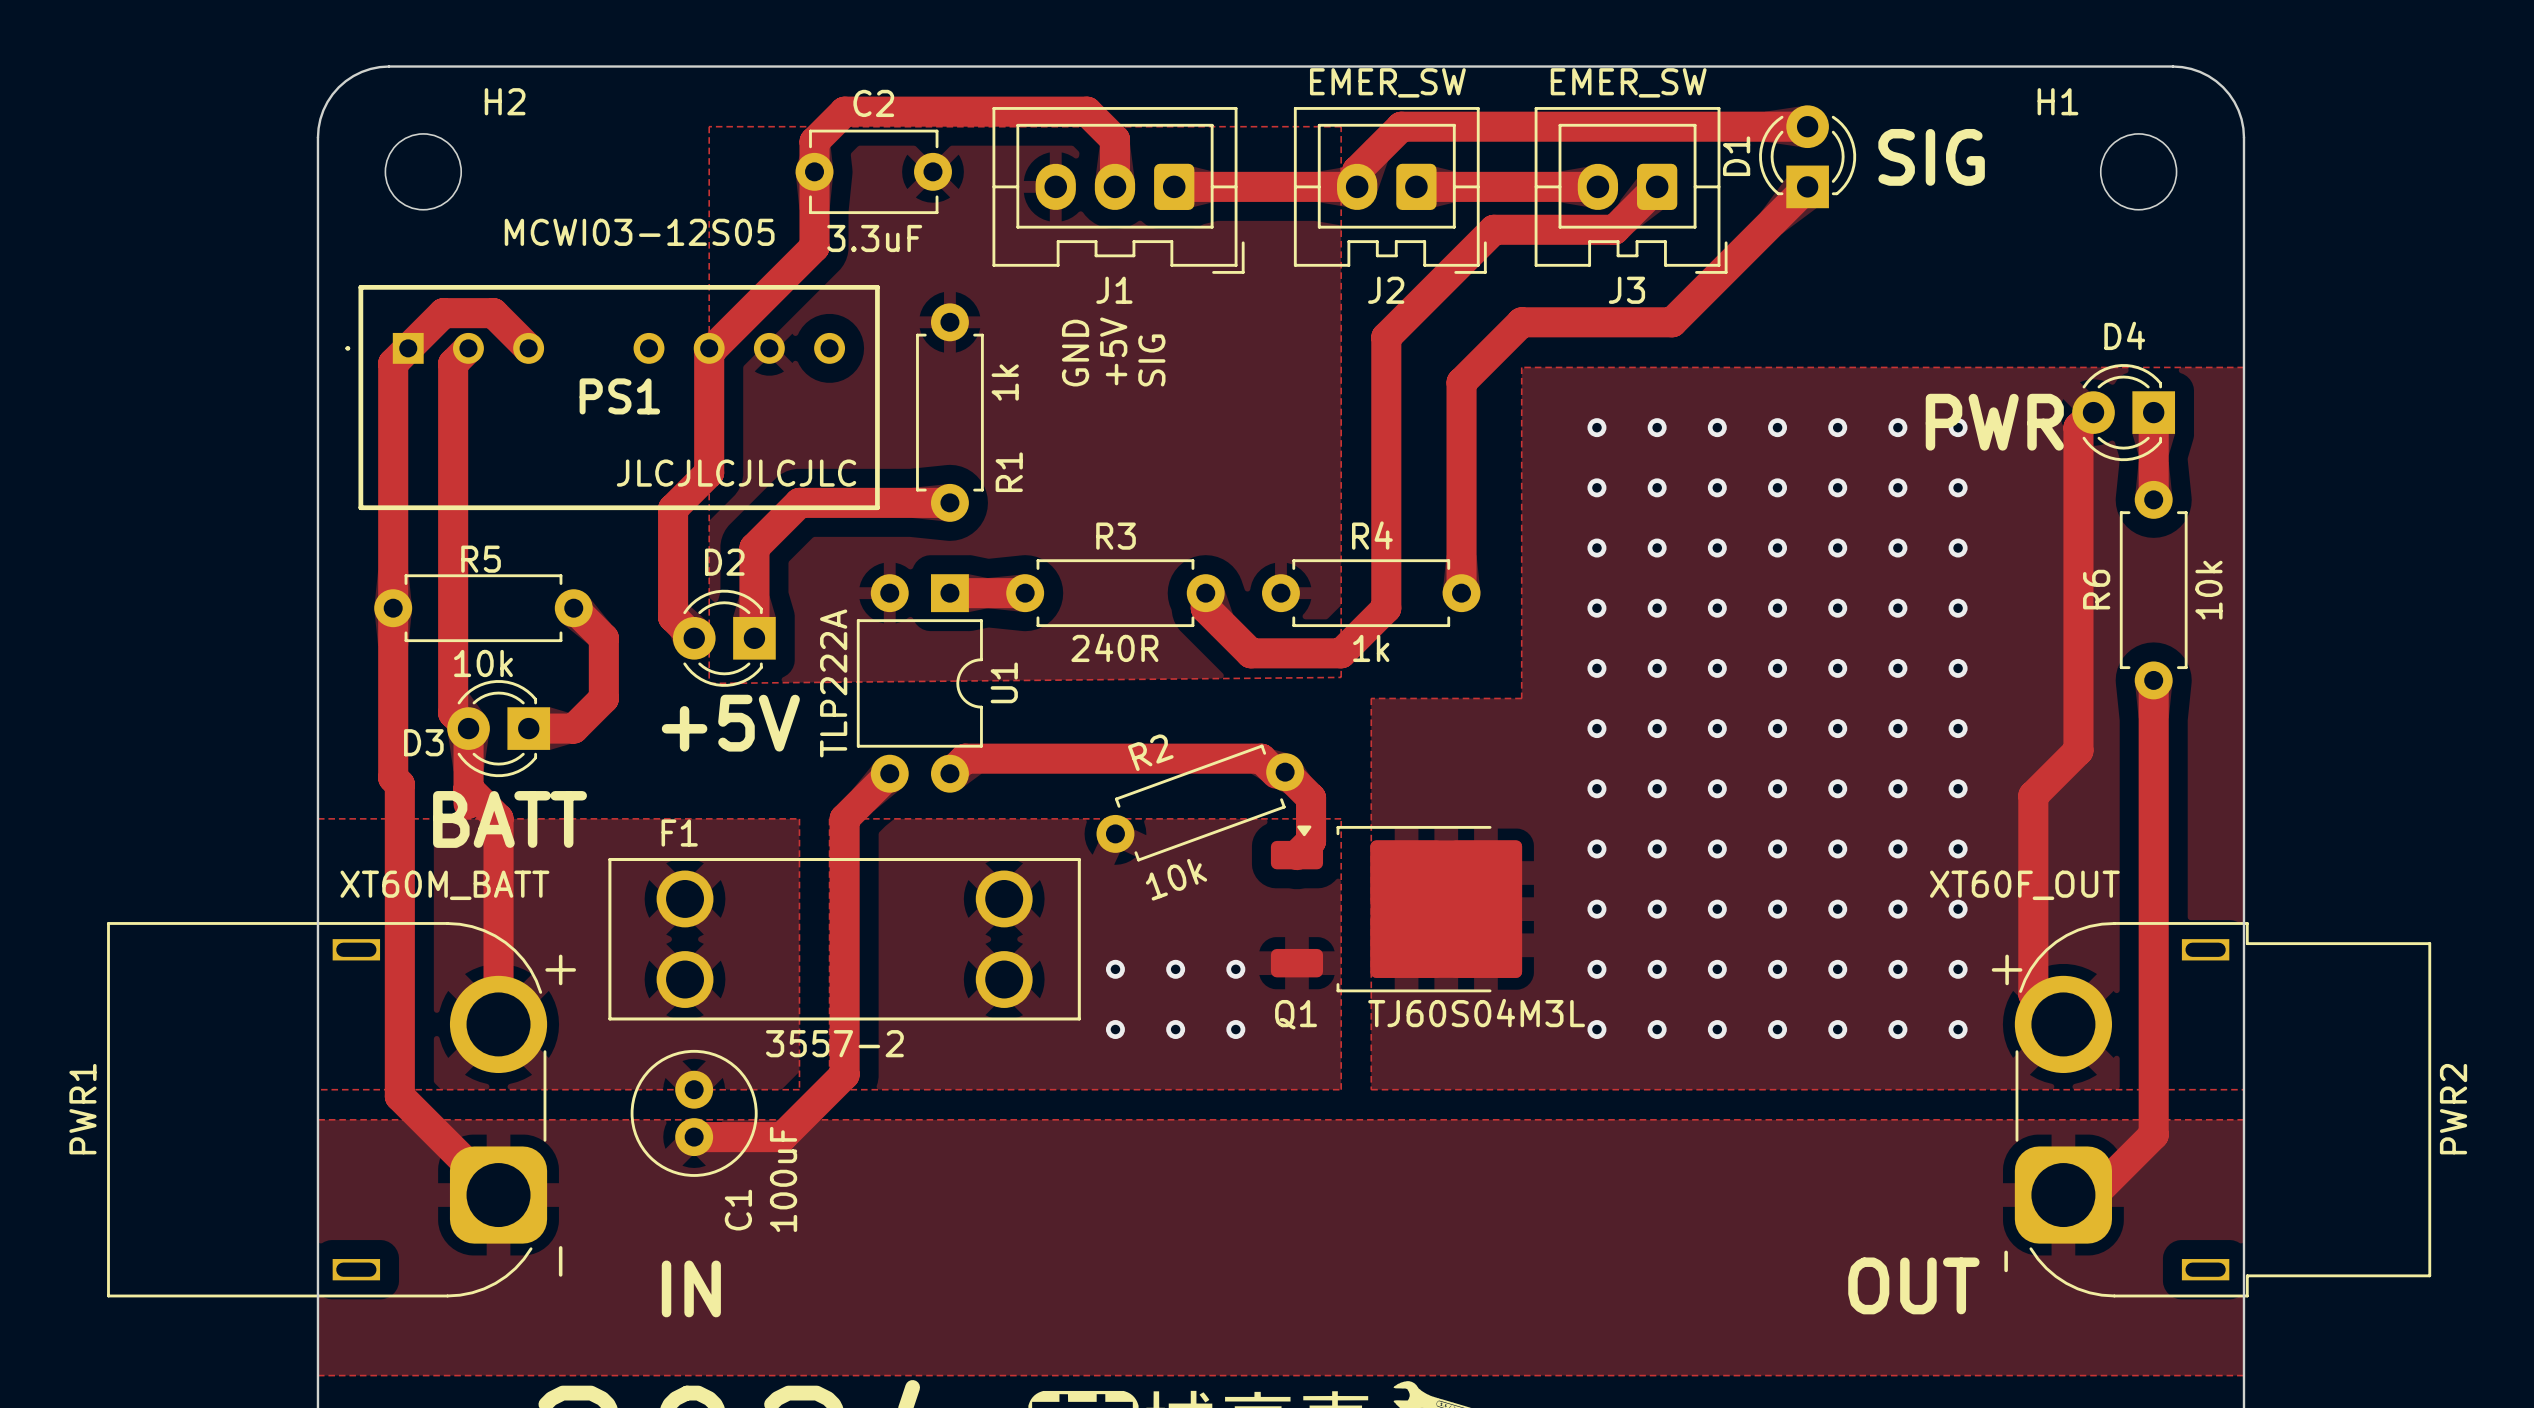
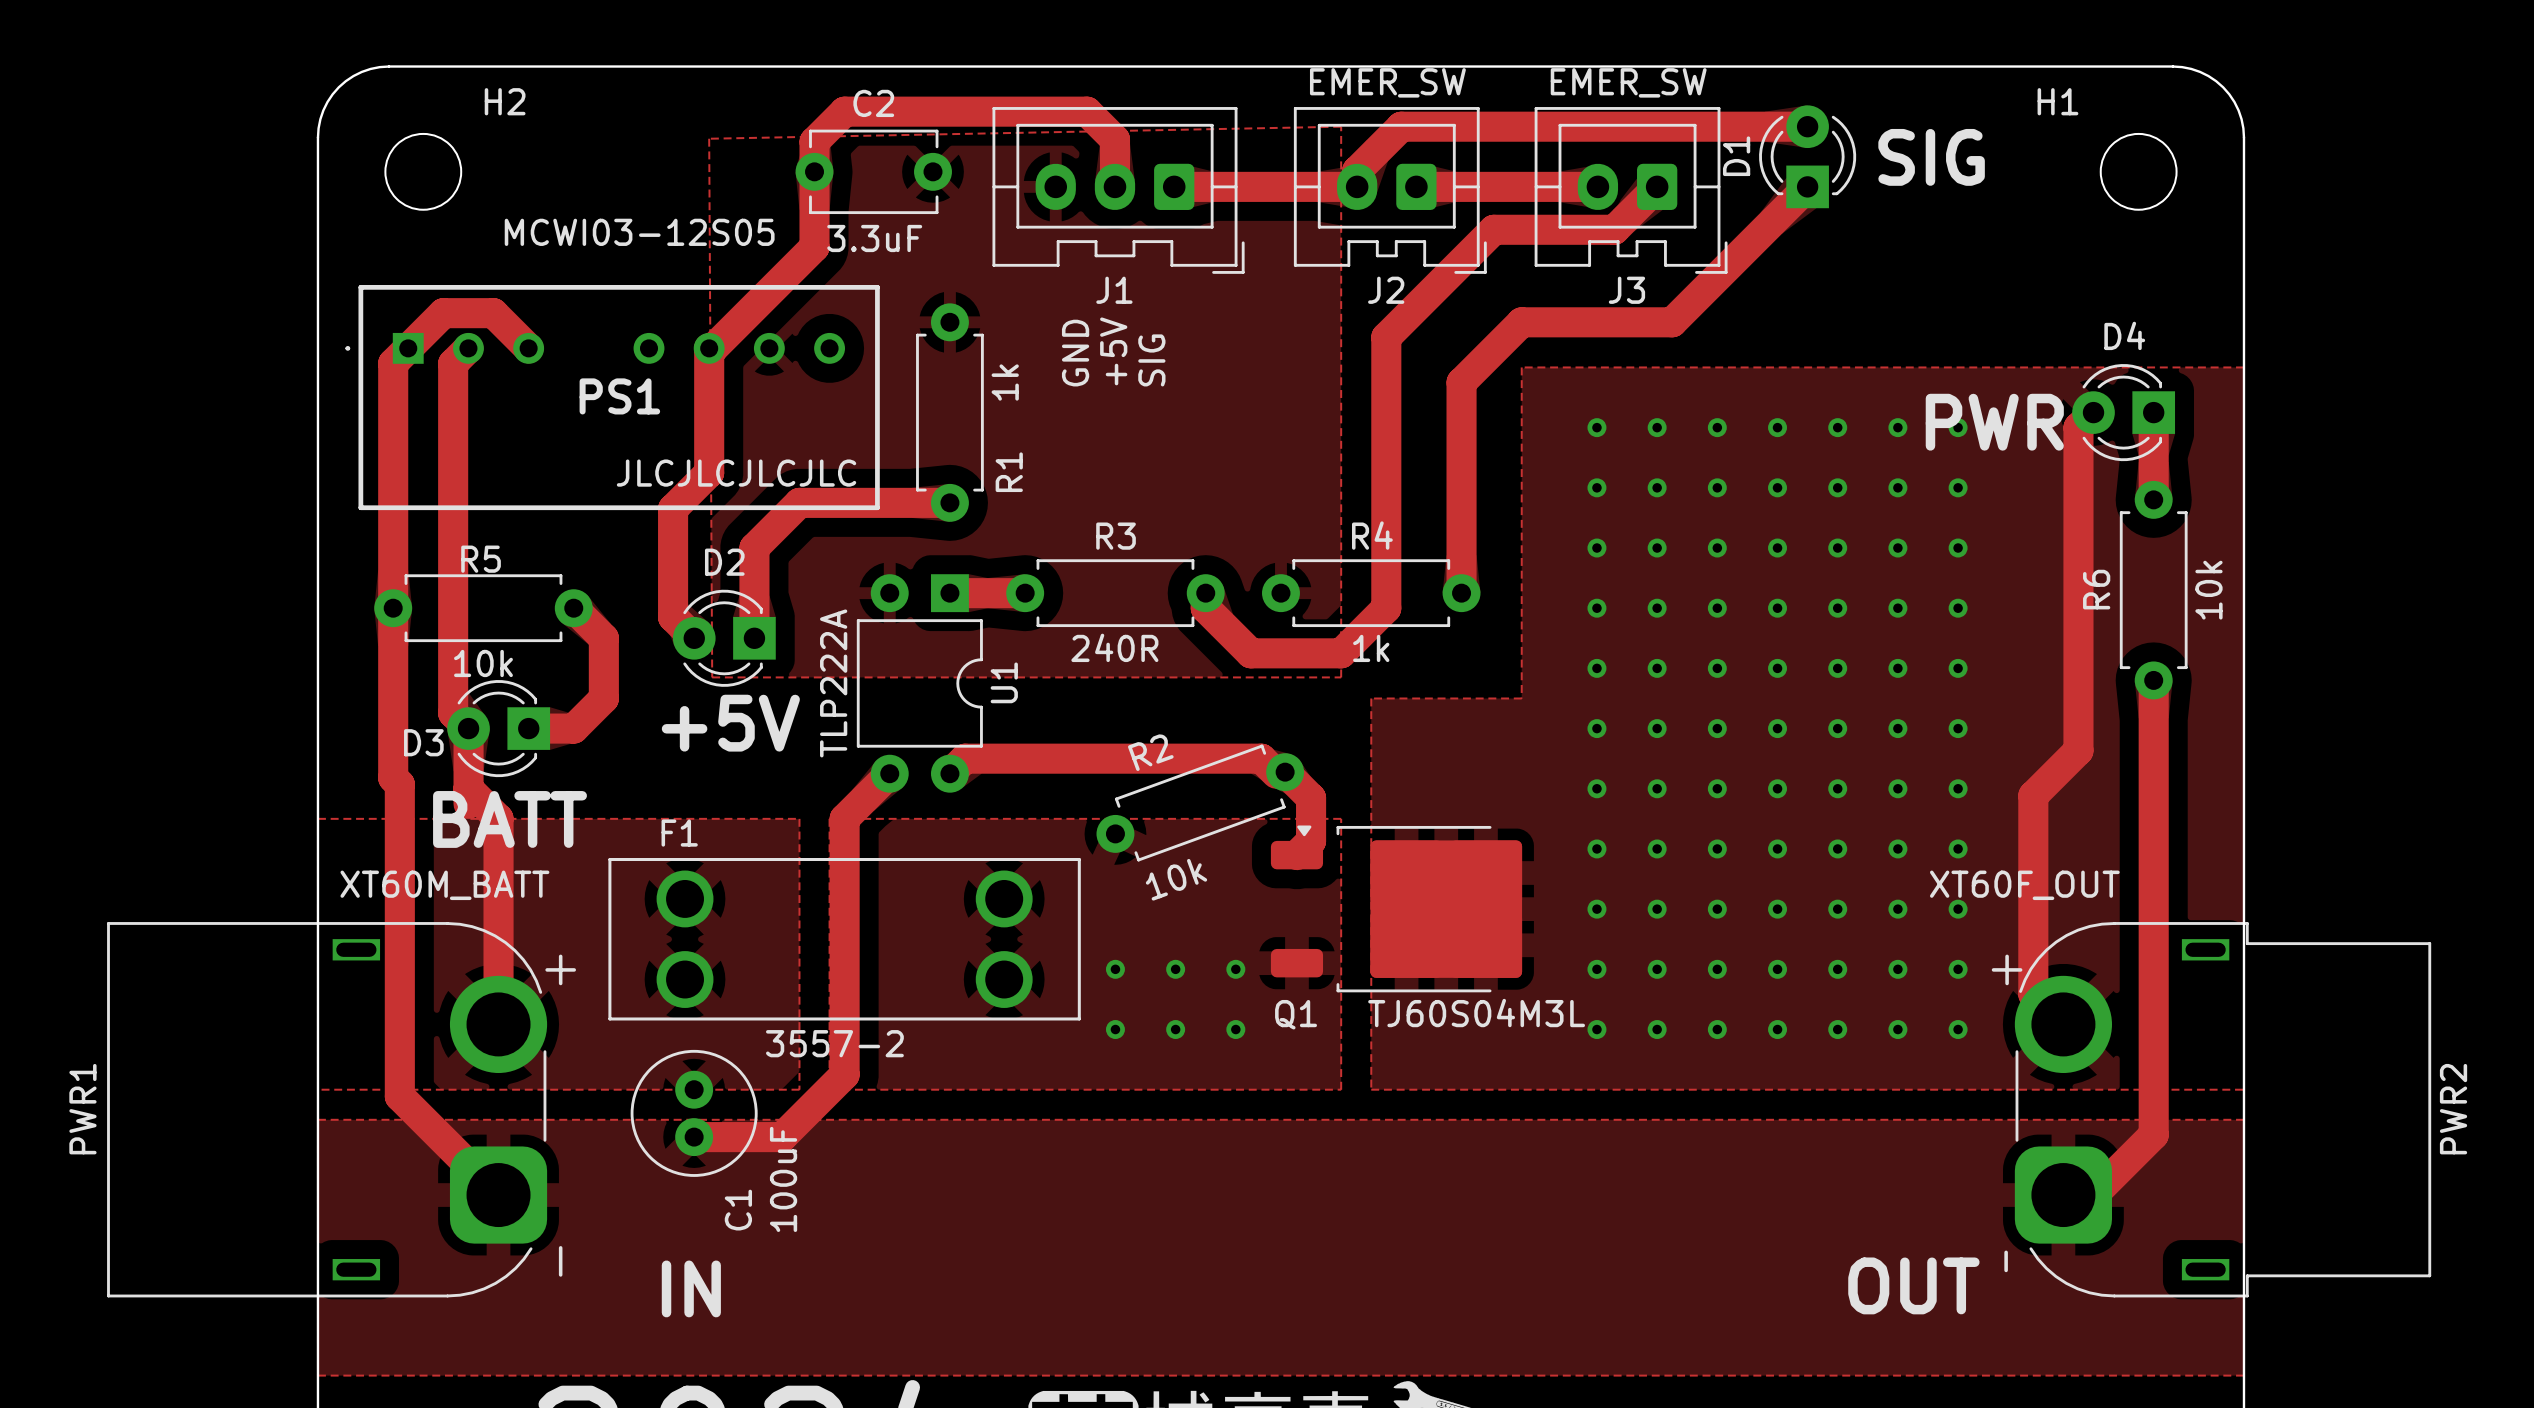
zone outline: (1341, 126) (709, 126) (709, 683) (1341, 677) -> (1341, 126) (709, 138) (712, 677) (1341, 677)

